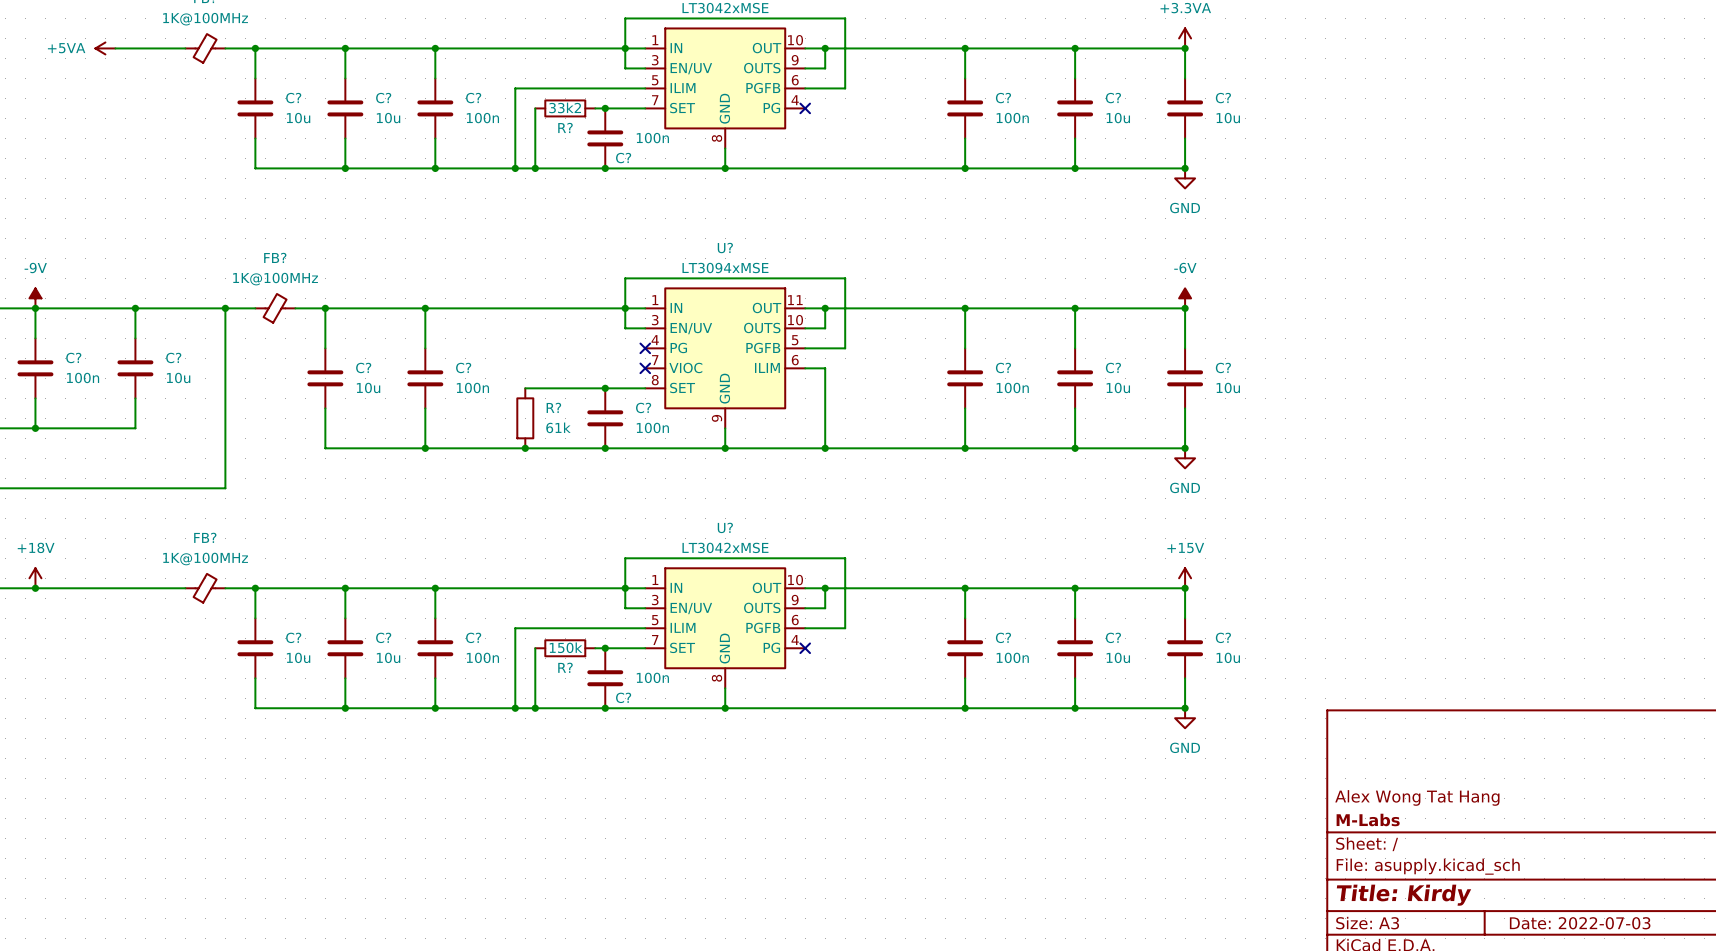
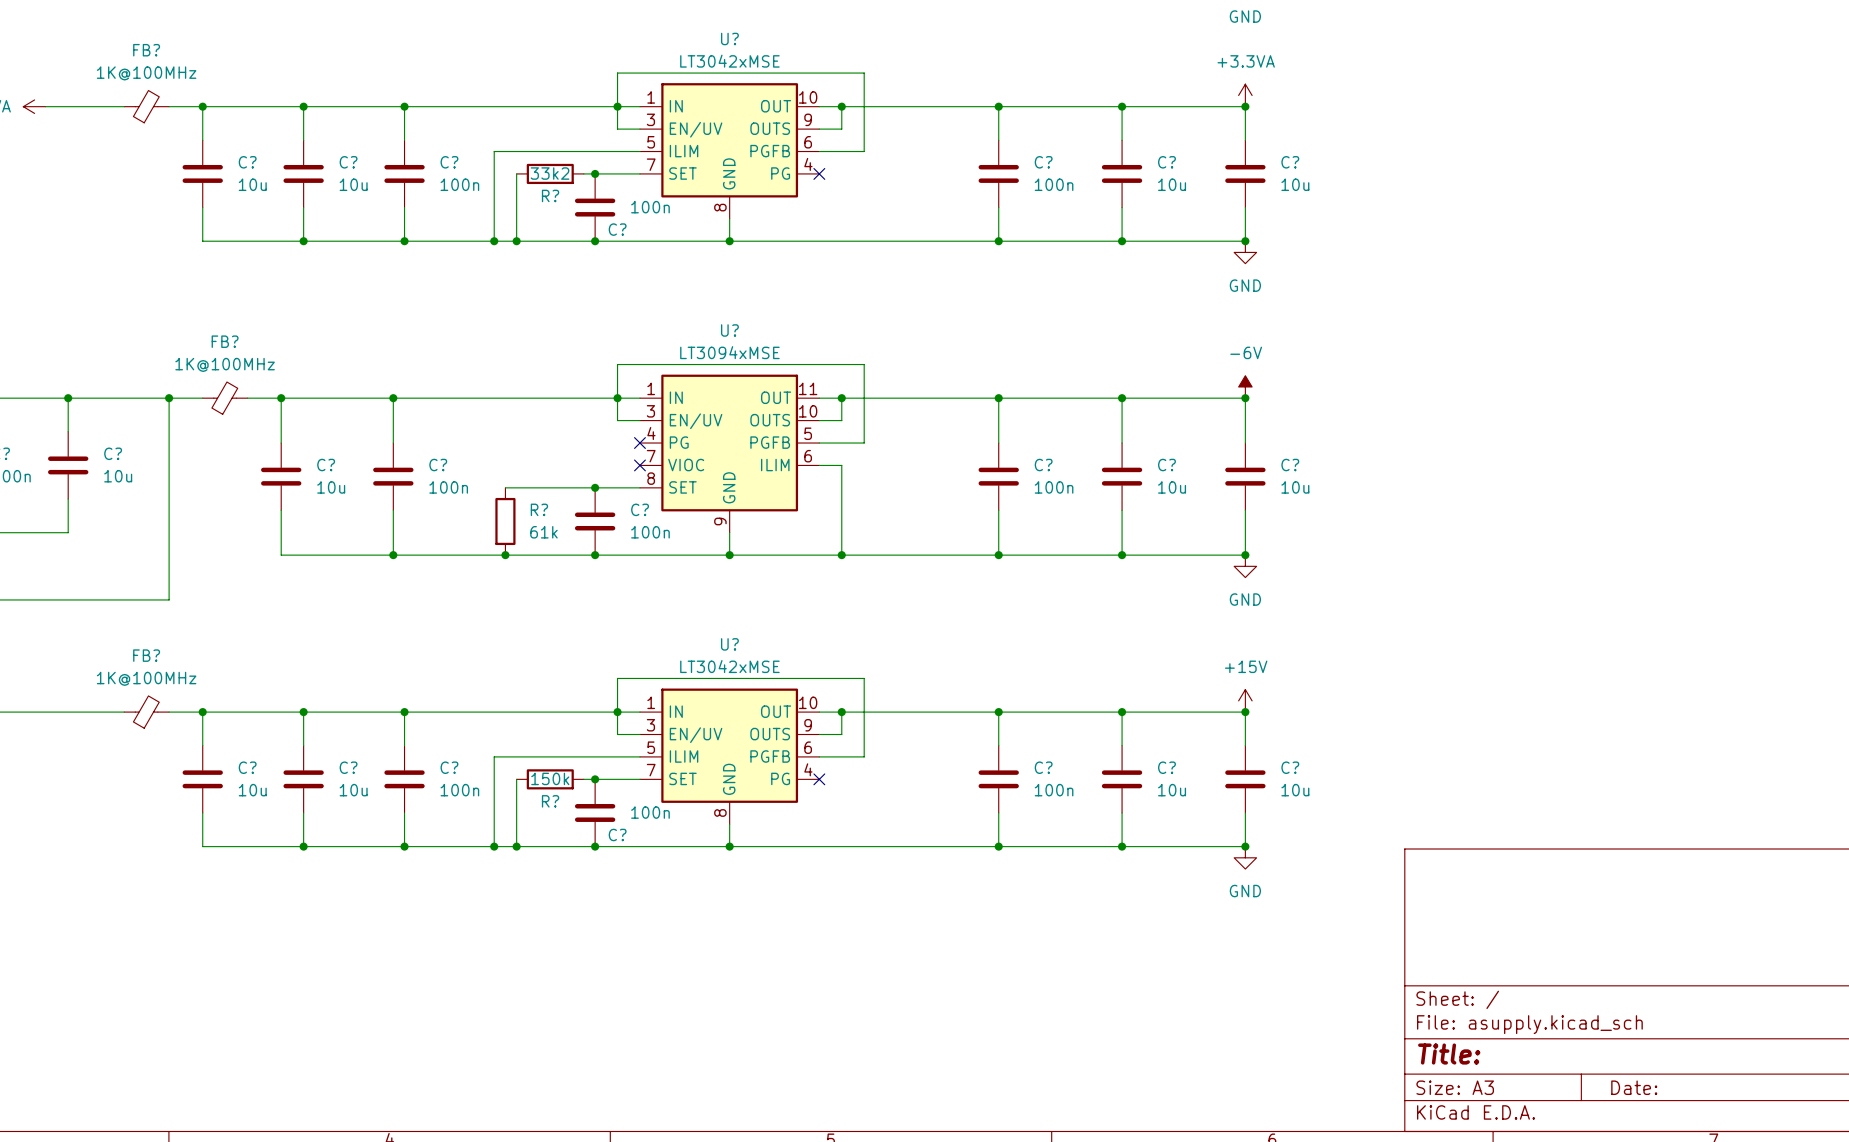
title block: Alex Wong Tat Hang (1417, 797) -> none
title block: M-Labs (1368, 819) -> none
title block: Title: Kirdy (1403, 895) -> Title: (1449, 1054)
title block: Date: 2022-07-03 (1580, 923) -> Date: (1634, 1087)

